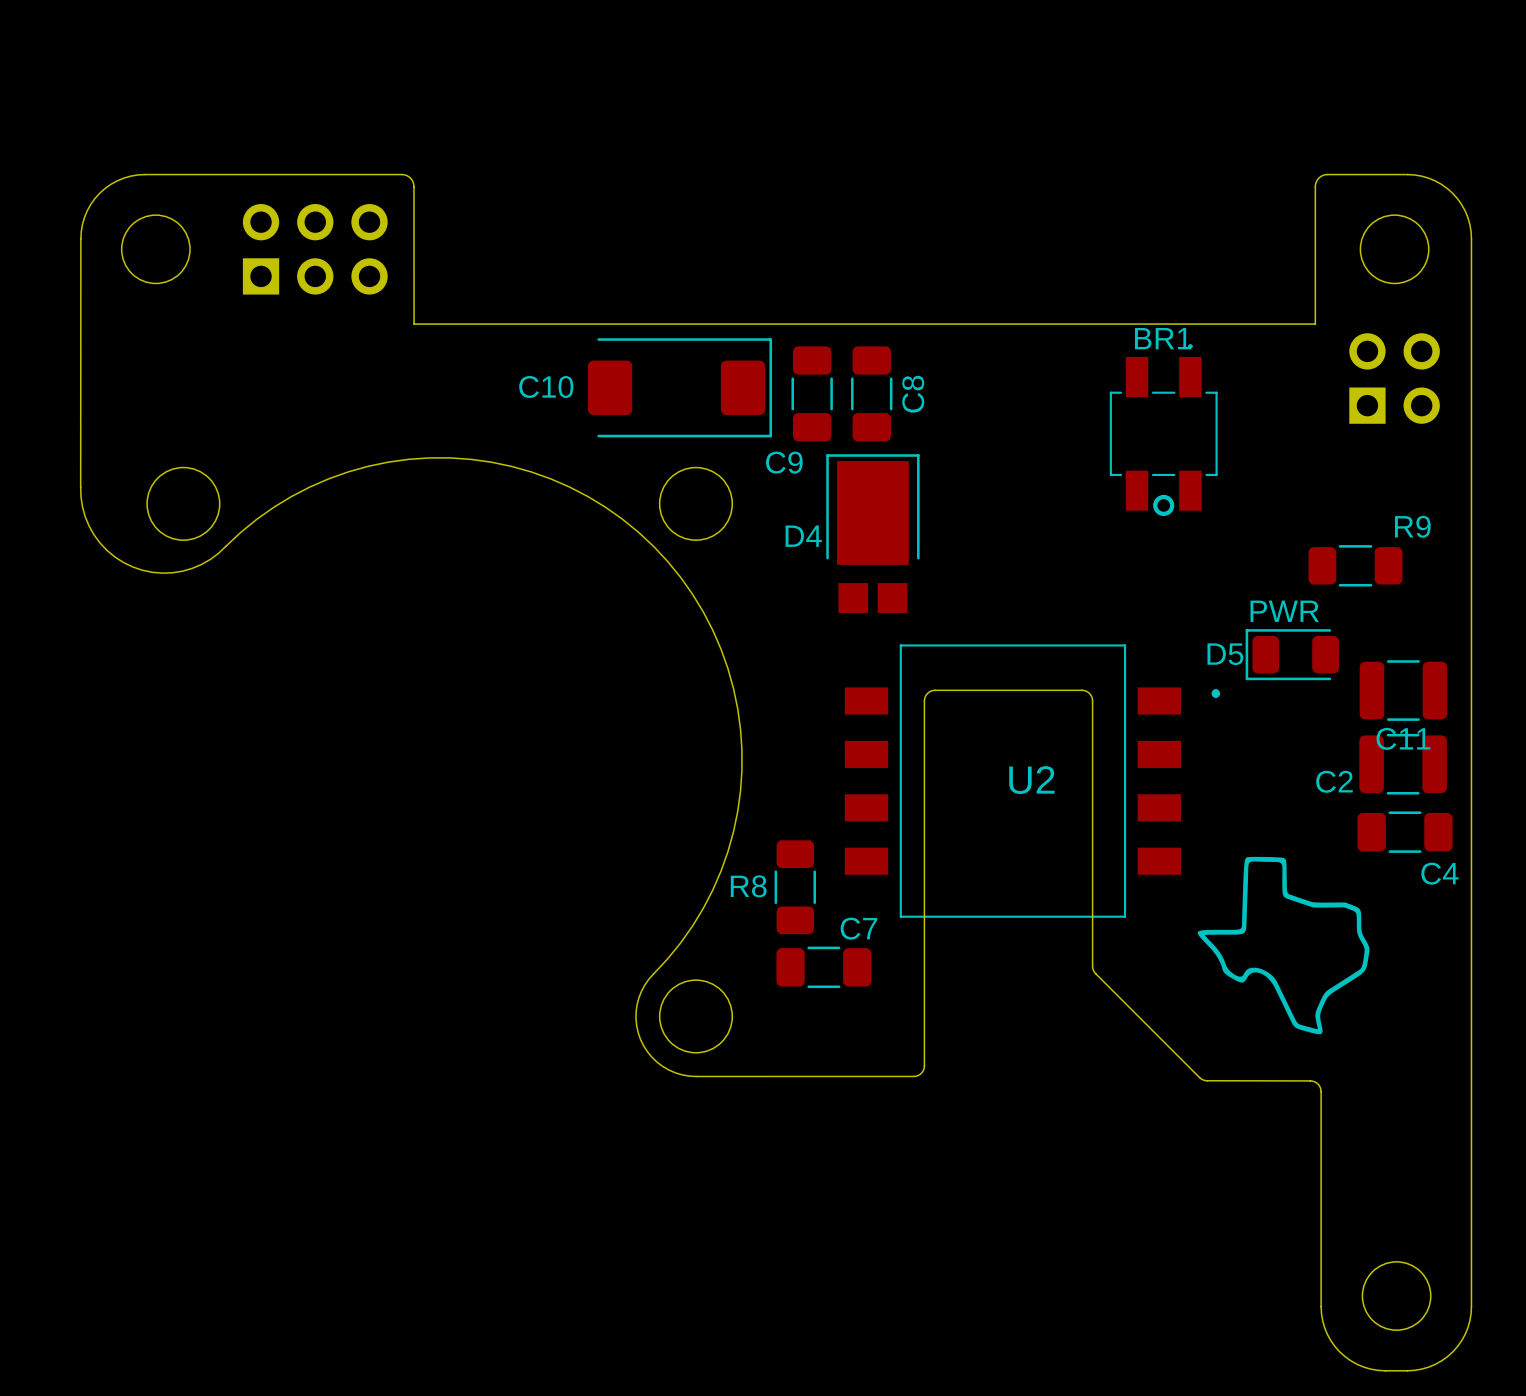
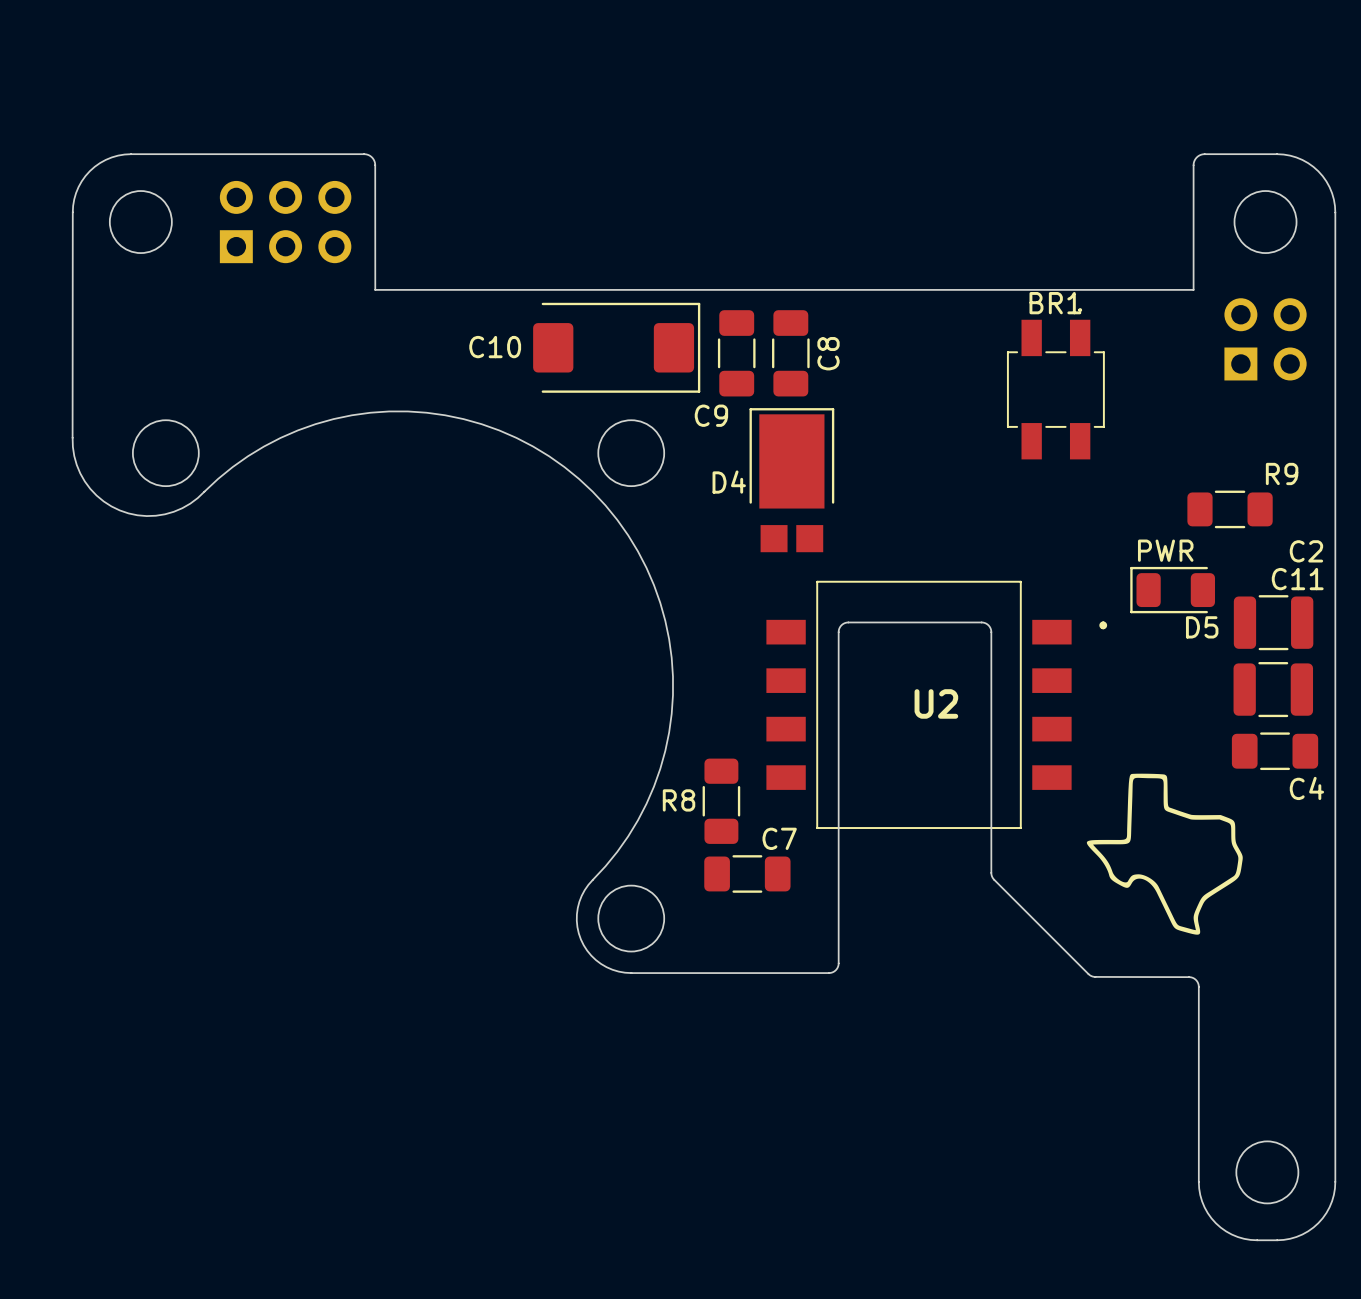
drawing: [1153, 494, 1175, 517] -> none
D5 name position: D5 (1225, 654) -> D5 (1202, 627)
C11 name position: C11 (1403, 738) -> C11 (1297, 579)
C2 name position: C2 (1334, 781) -> C2 (1306, 551)

